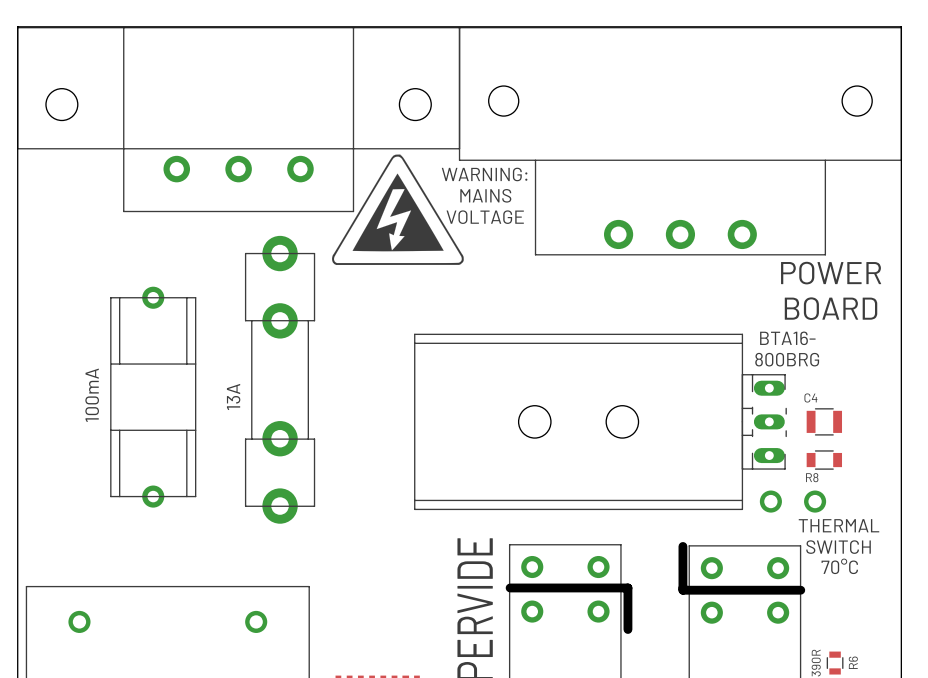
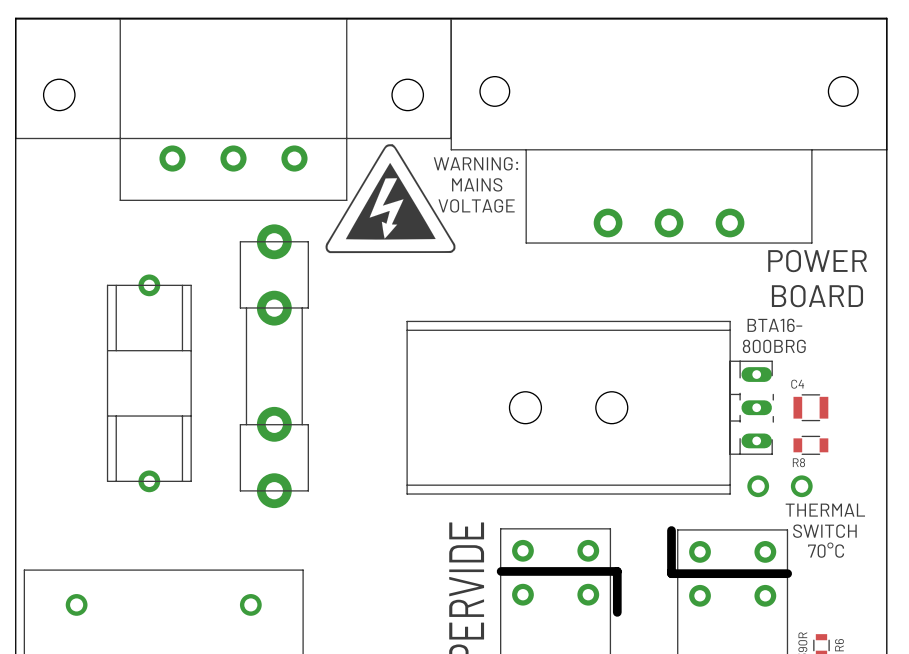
part value: 100mA (92, 395) -> none
part value: 13A (233, 396) -> none

